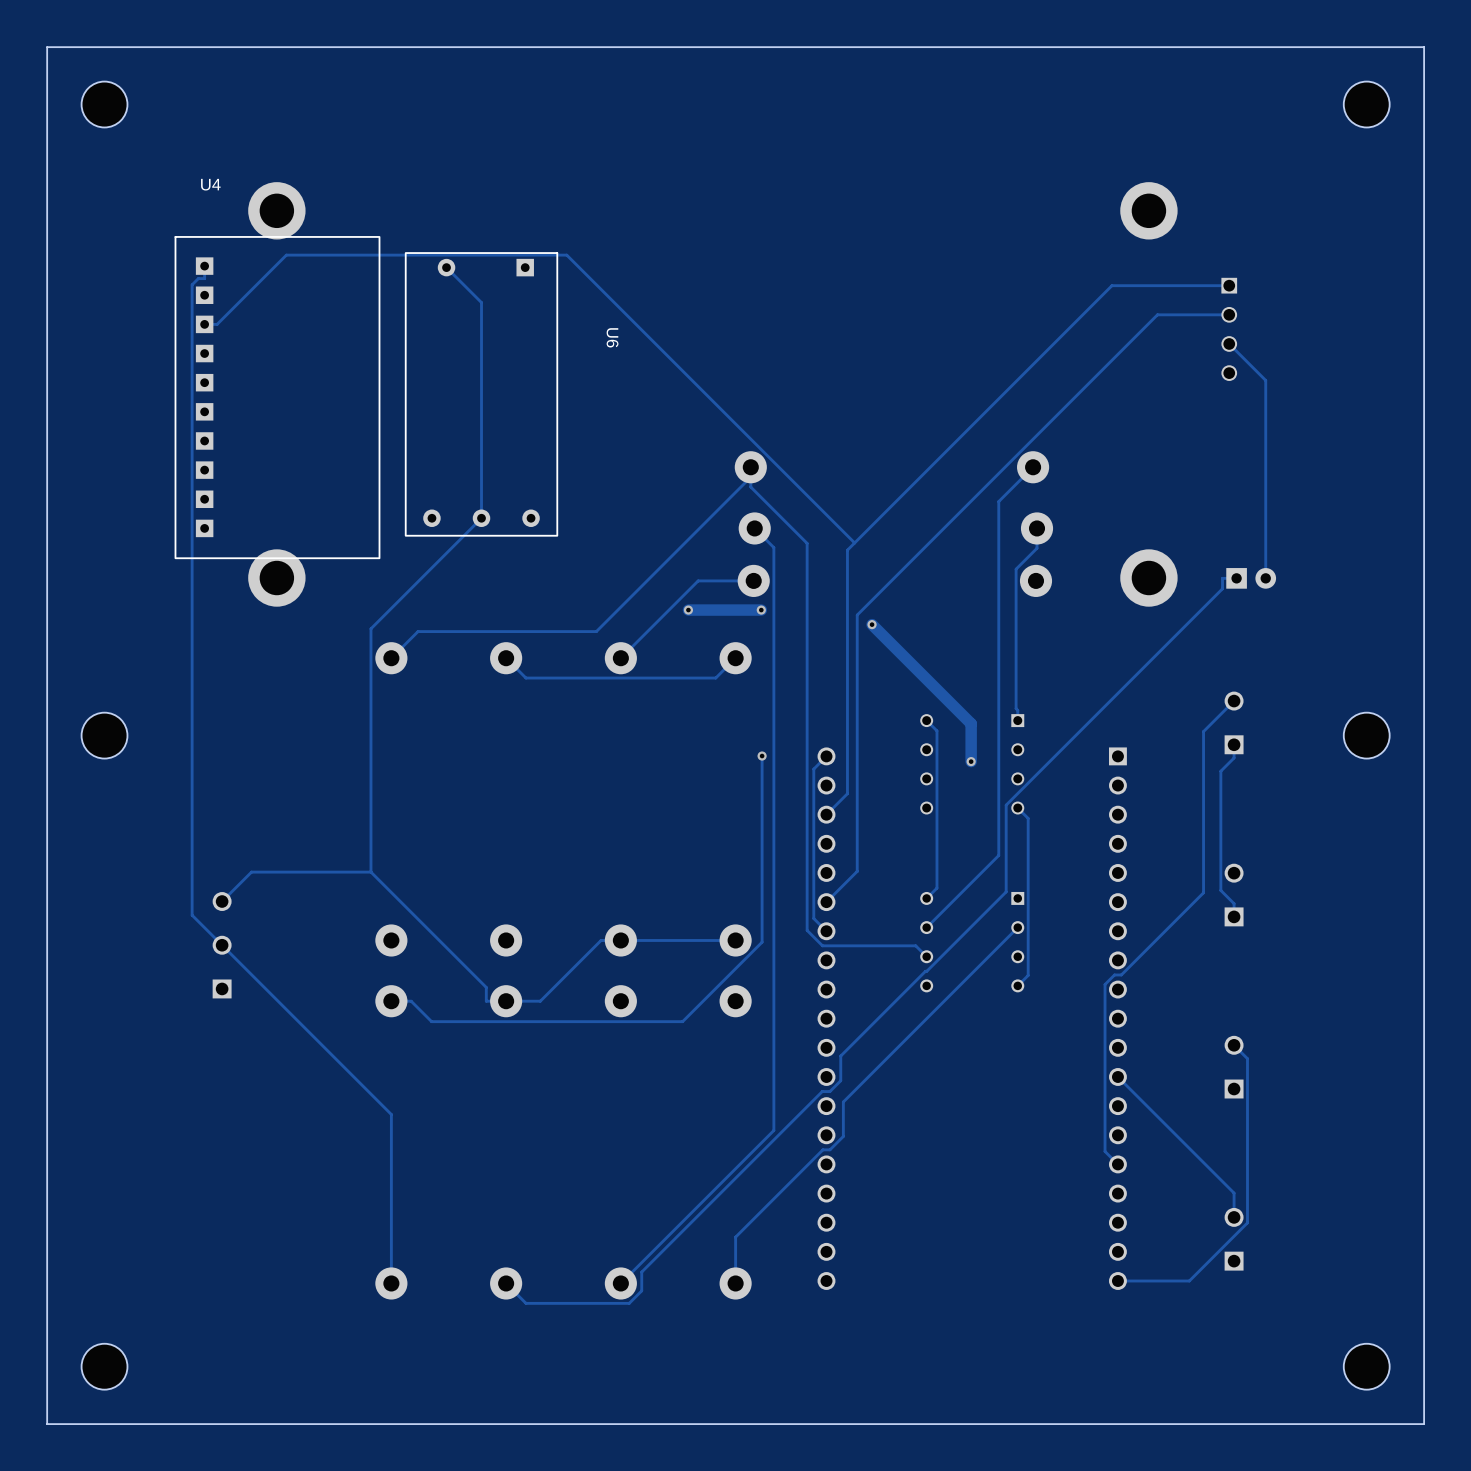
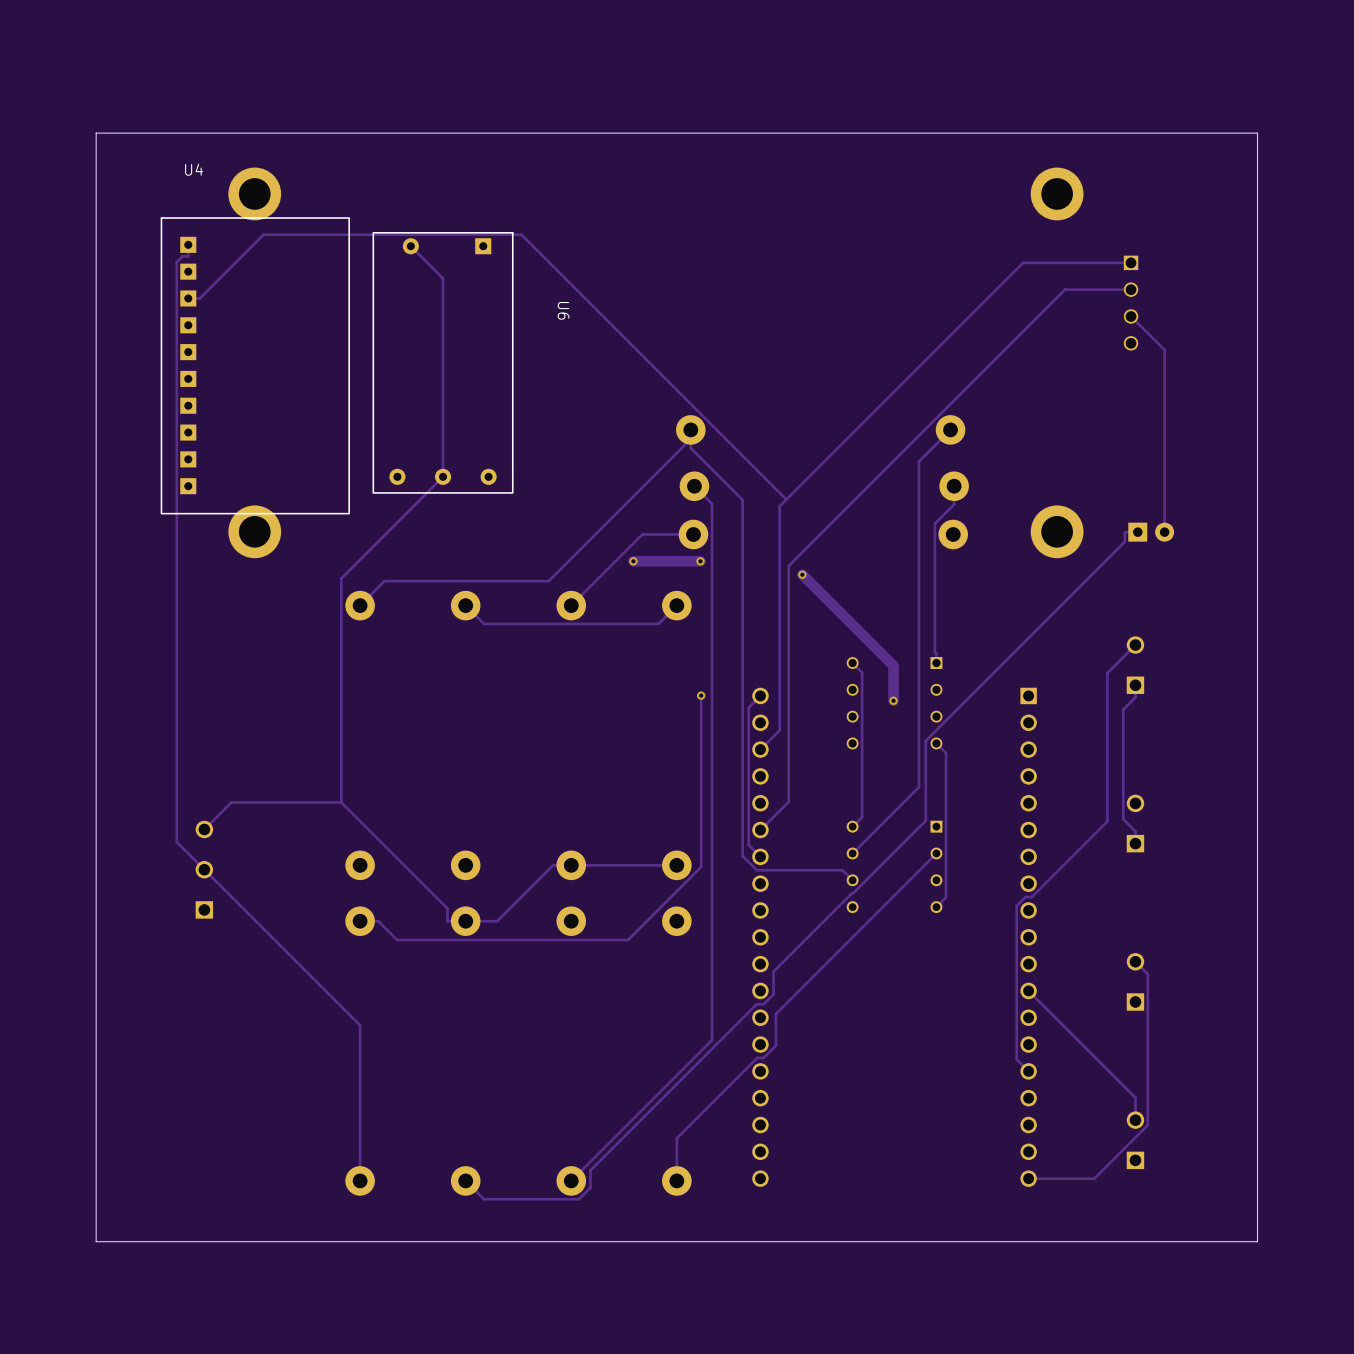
board edge: (1424, 47) (47, 47) (47, 1424) (1424, 1424) (1424, 47) -> (1257, 133) (1257, 1241) (96, 1241) (96, 133) (1257, 133)
part: (104, 104) -> none
part: (1366, 104) -> none
part: (104, 735) -> none
part: (1366, 735) -> none
part: (104, 1366) -> none
part: (1366, 1366) -> none

